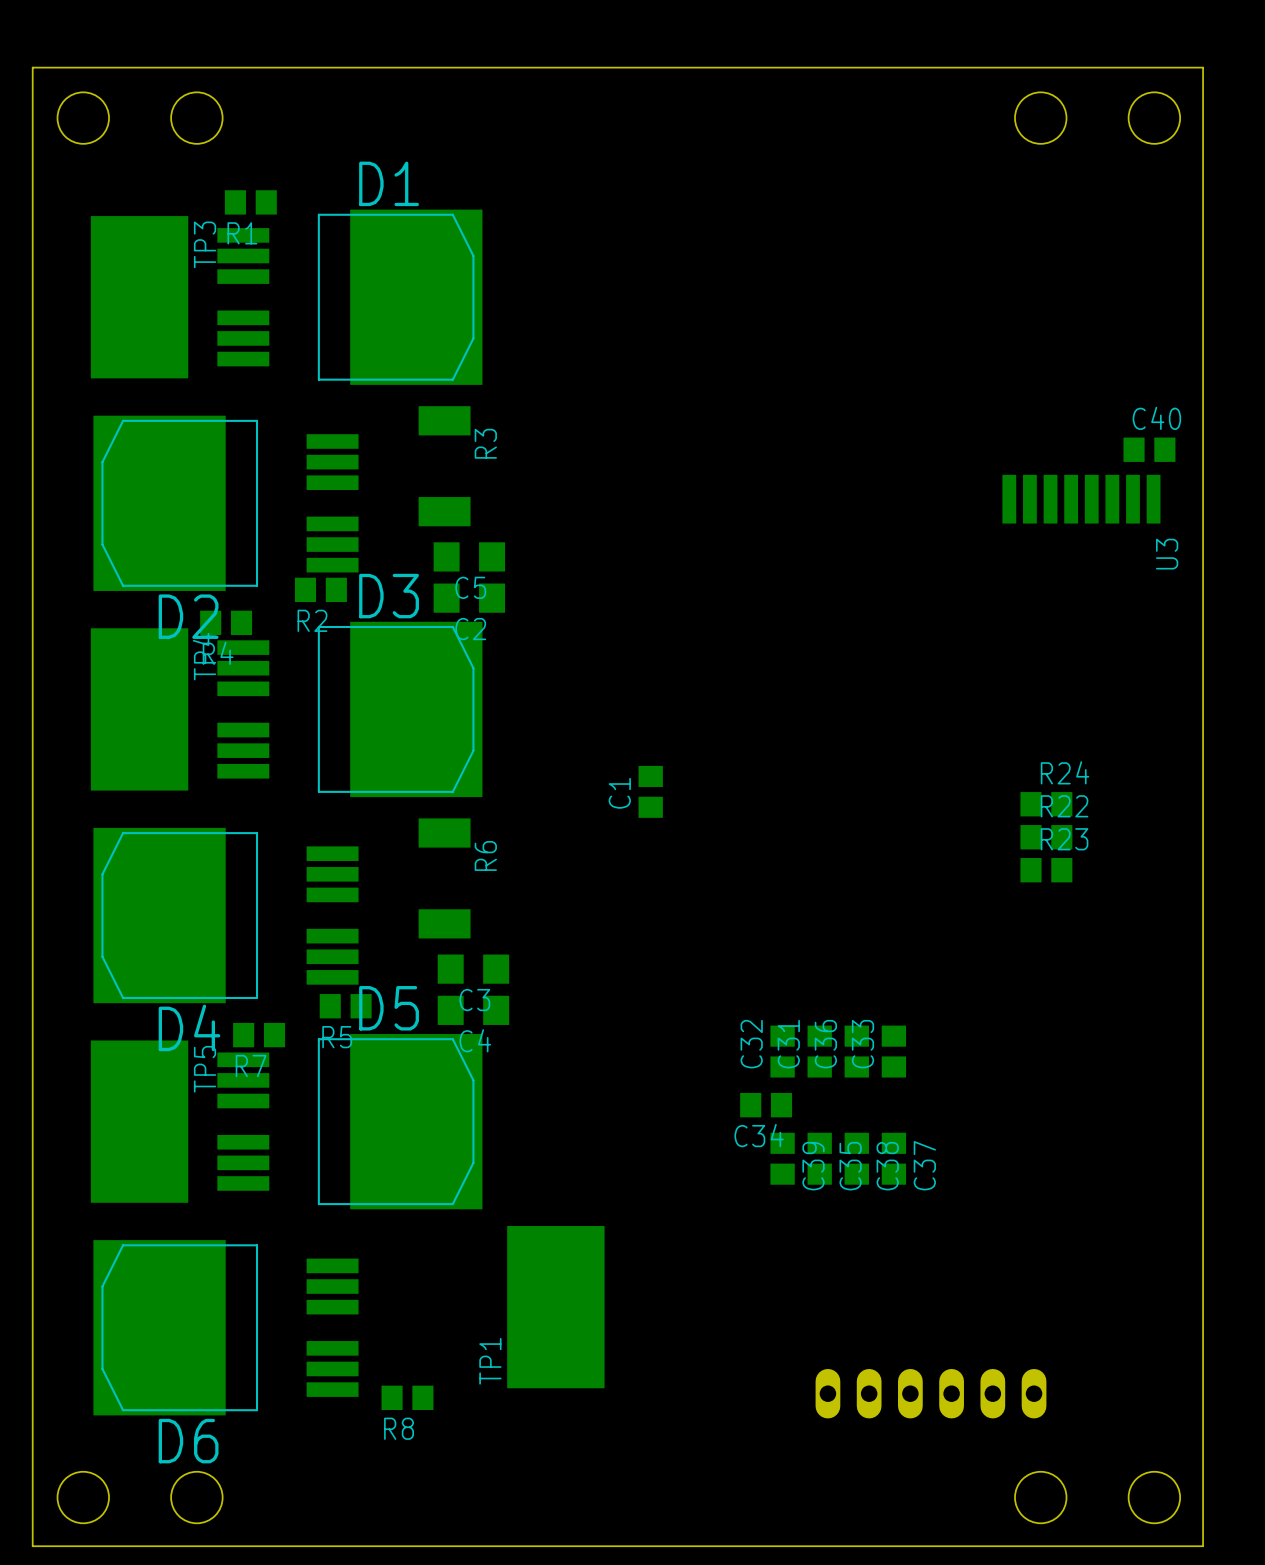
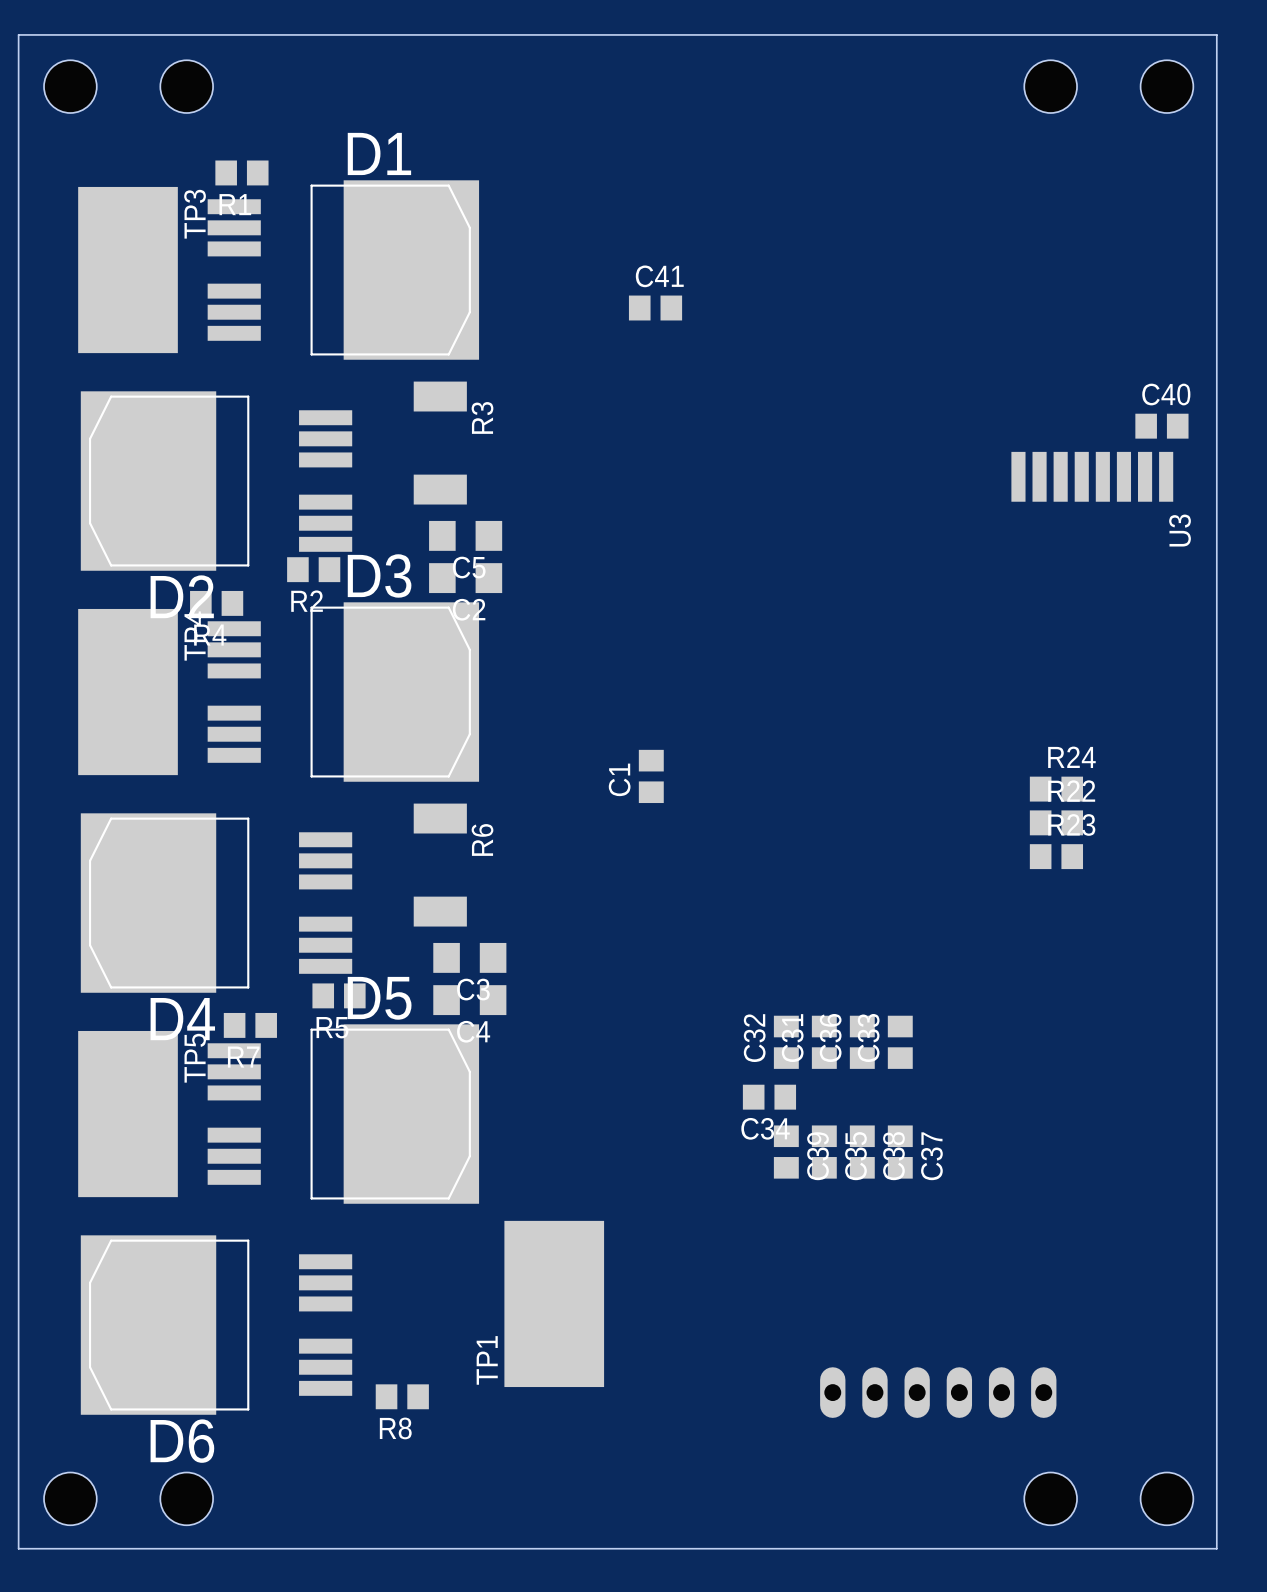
C41: none -> (655, 308)

